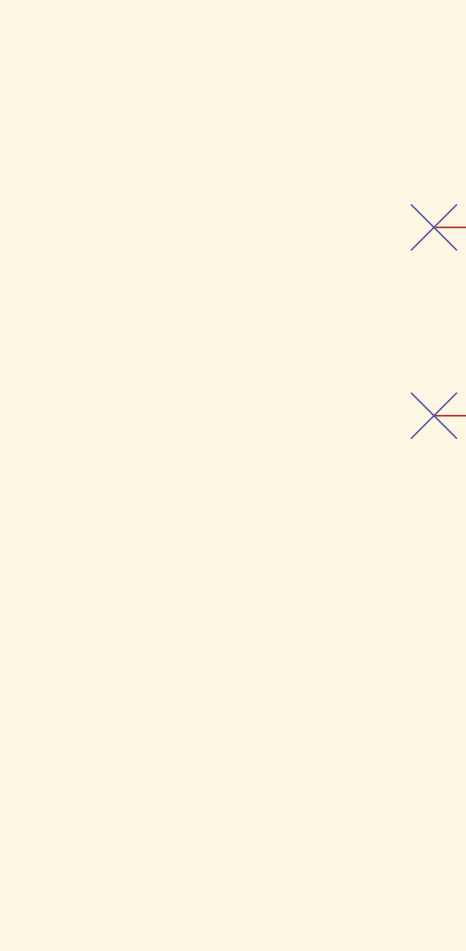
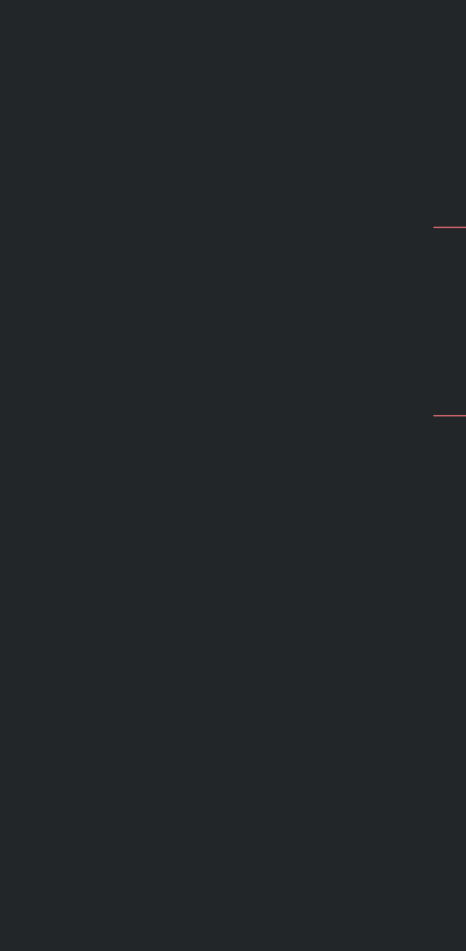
no-connect mark: (433, 227) -> none
no-connect mark: (433, 415) -> none

